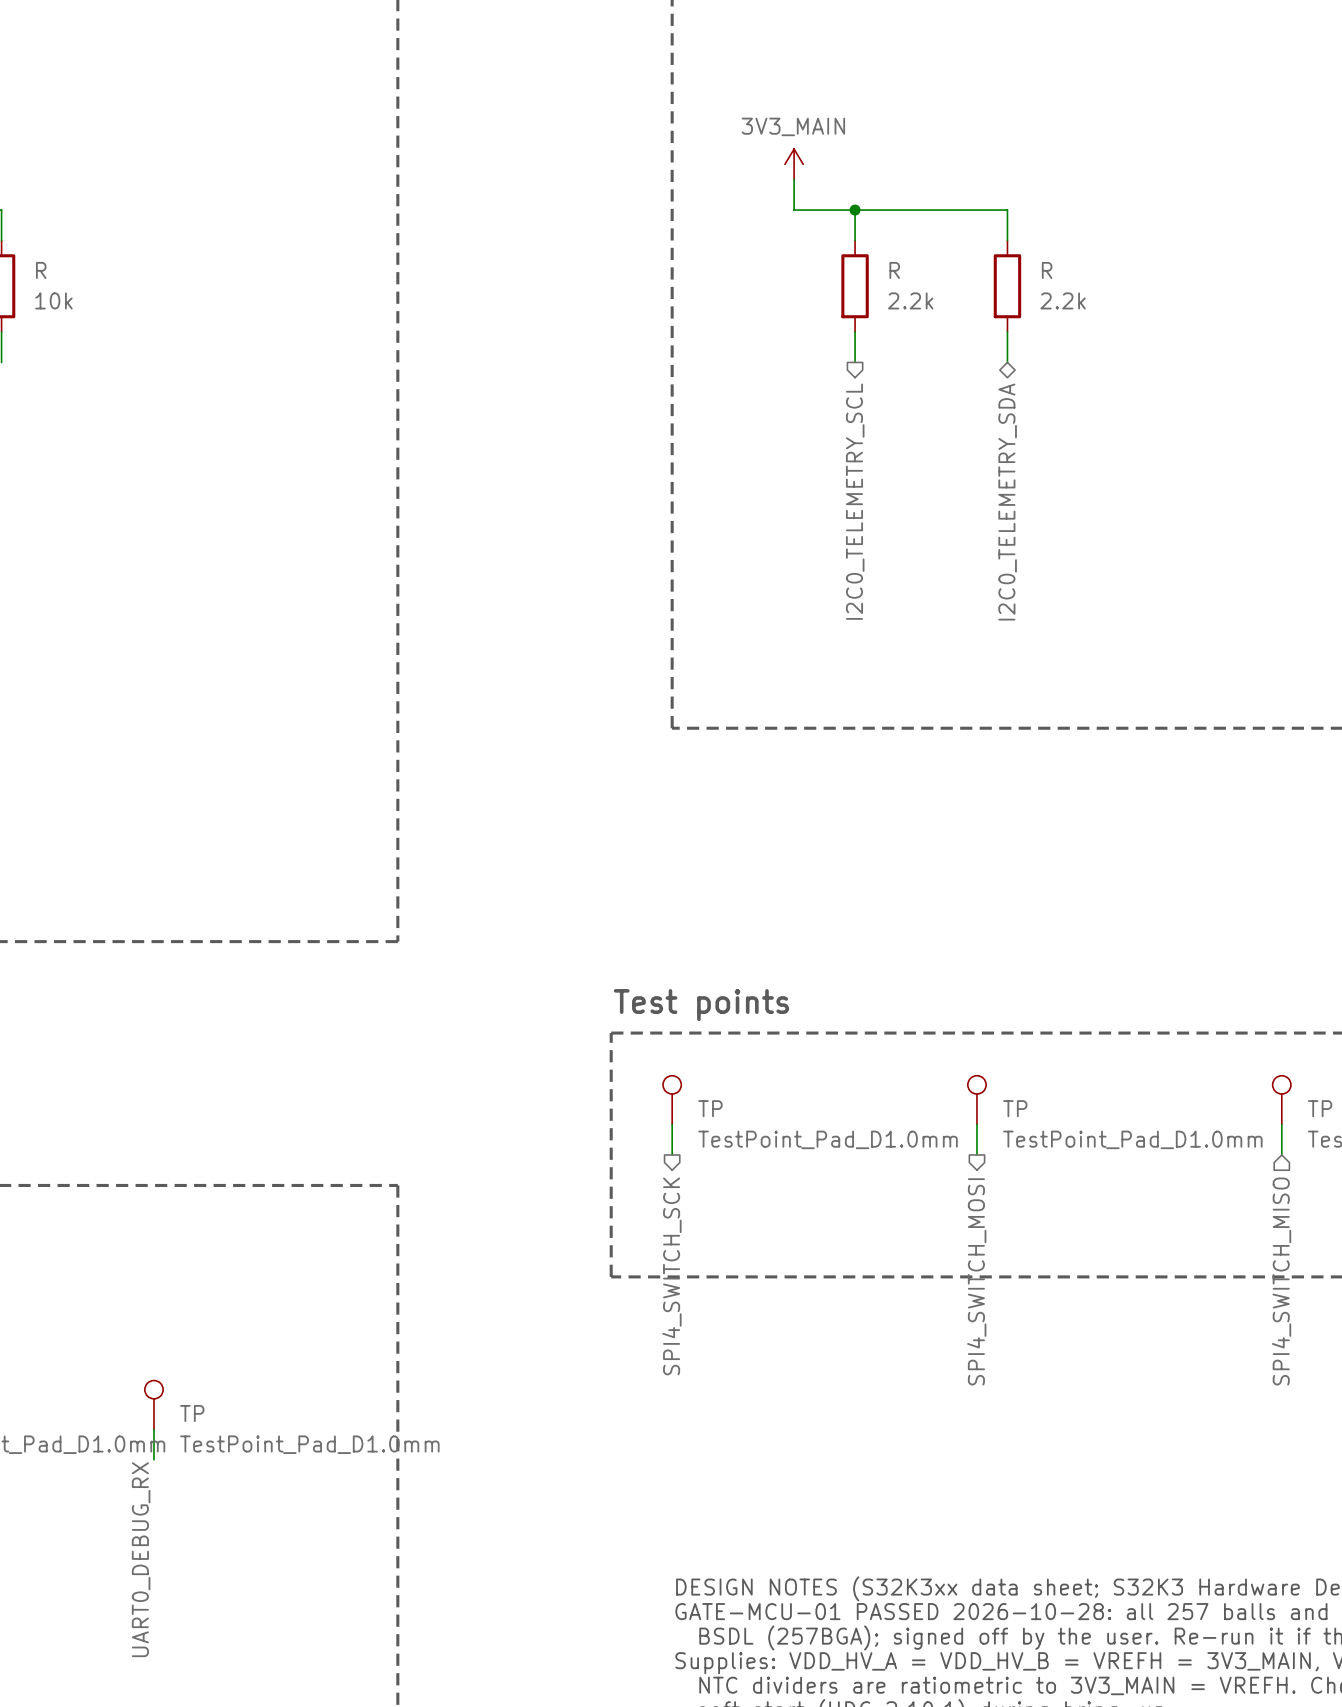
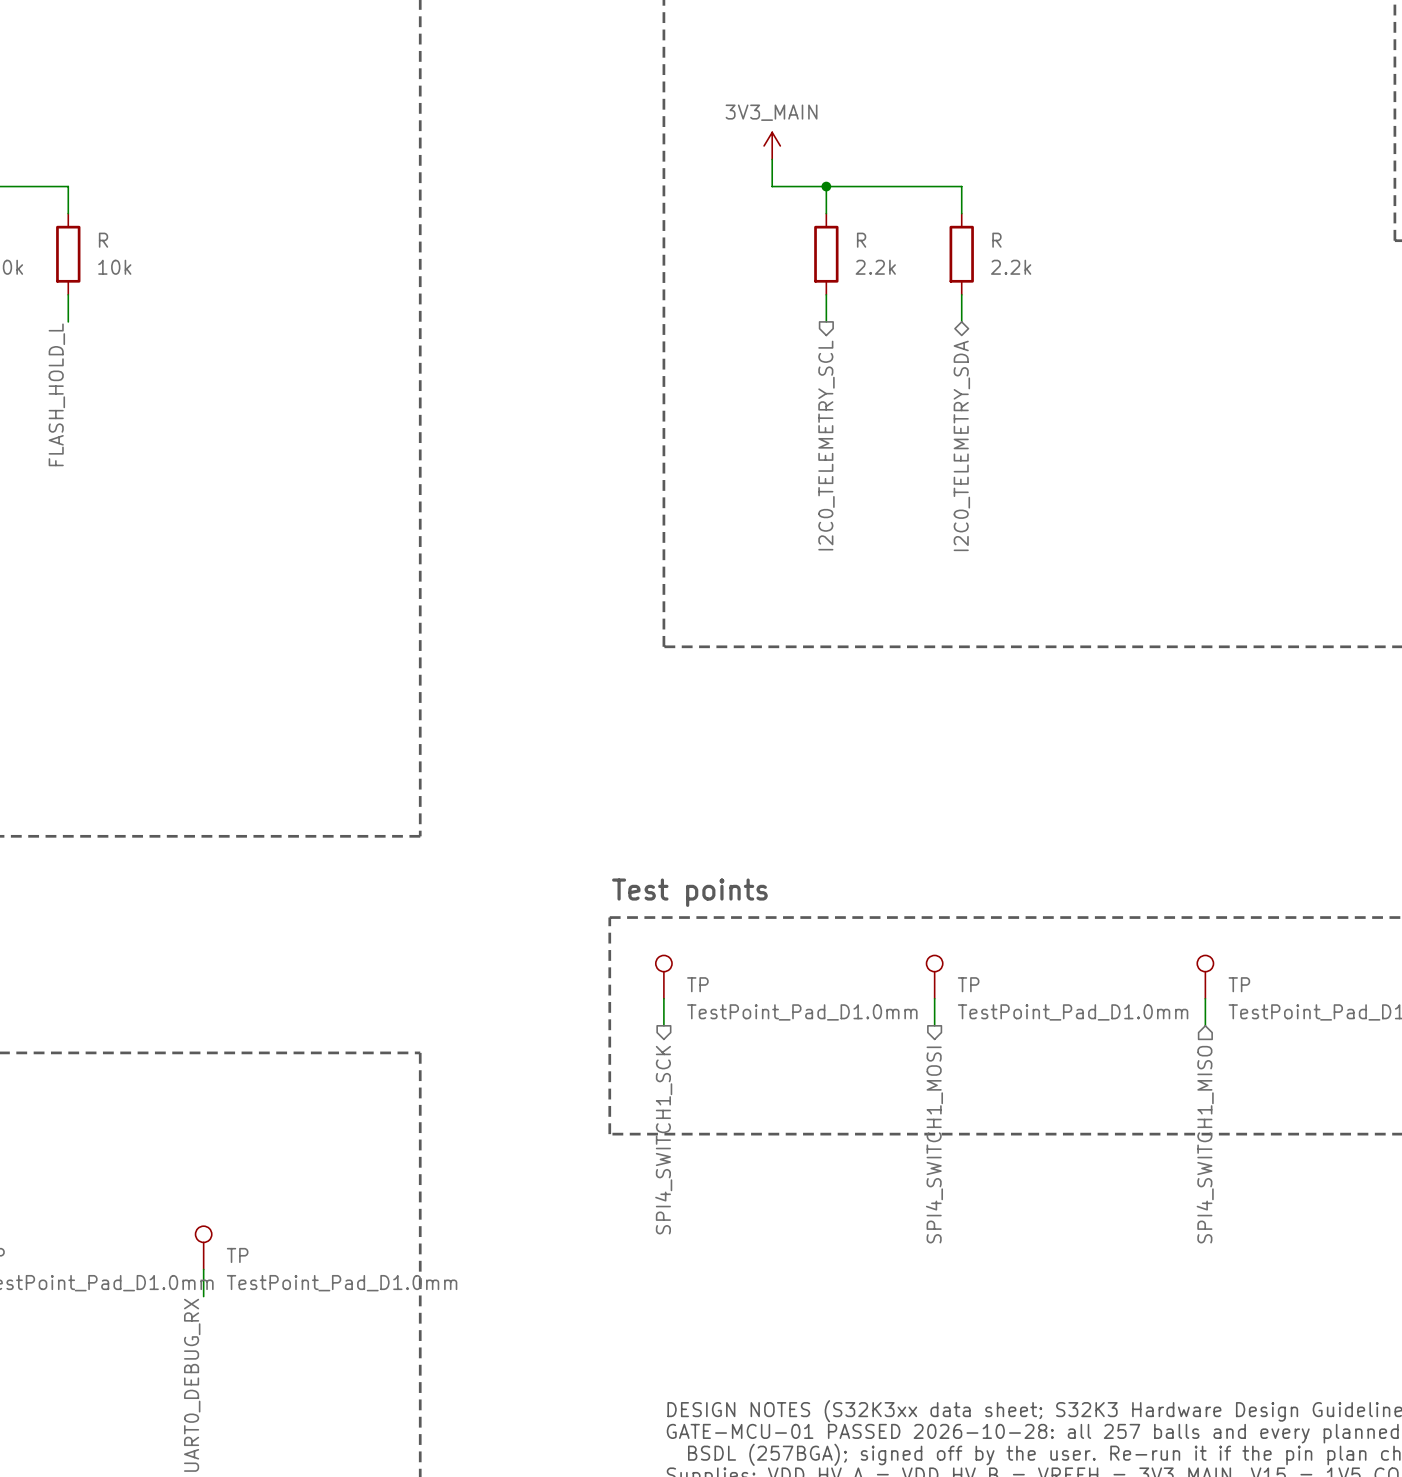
hierarchical label: SPI4_SWITCH_SCK (671, 1276) -> SPI4_SWITCH1_SCK (663, 1140)
hierarchical label: SPI4_SWITCH_MOSI (976, 1281) -> SPI4_SWITCH1_MOSI (934, 1144)
hierarchical label: SPI4_SWITCH_MISO (1281, 1281) -> SPI4_SWITCH1_MISO (1205, 1144)

